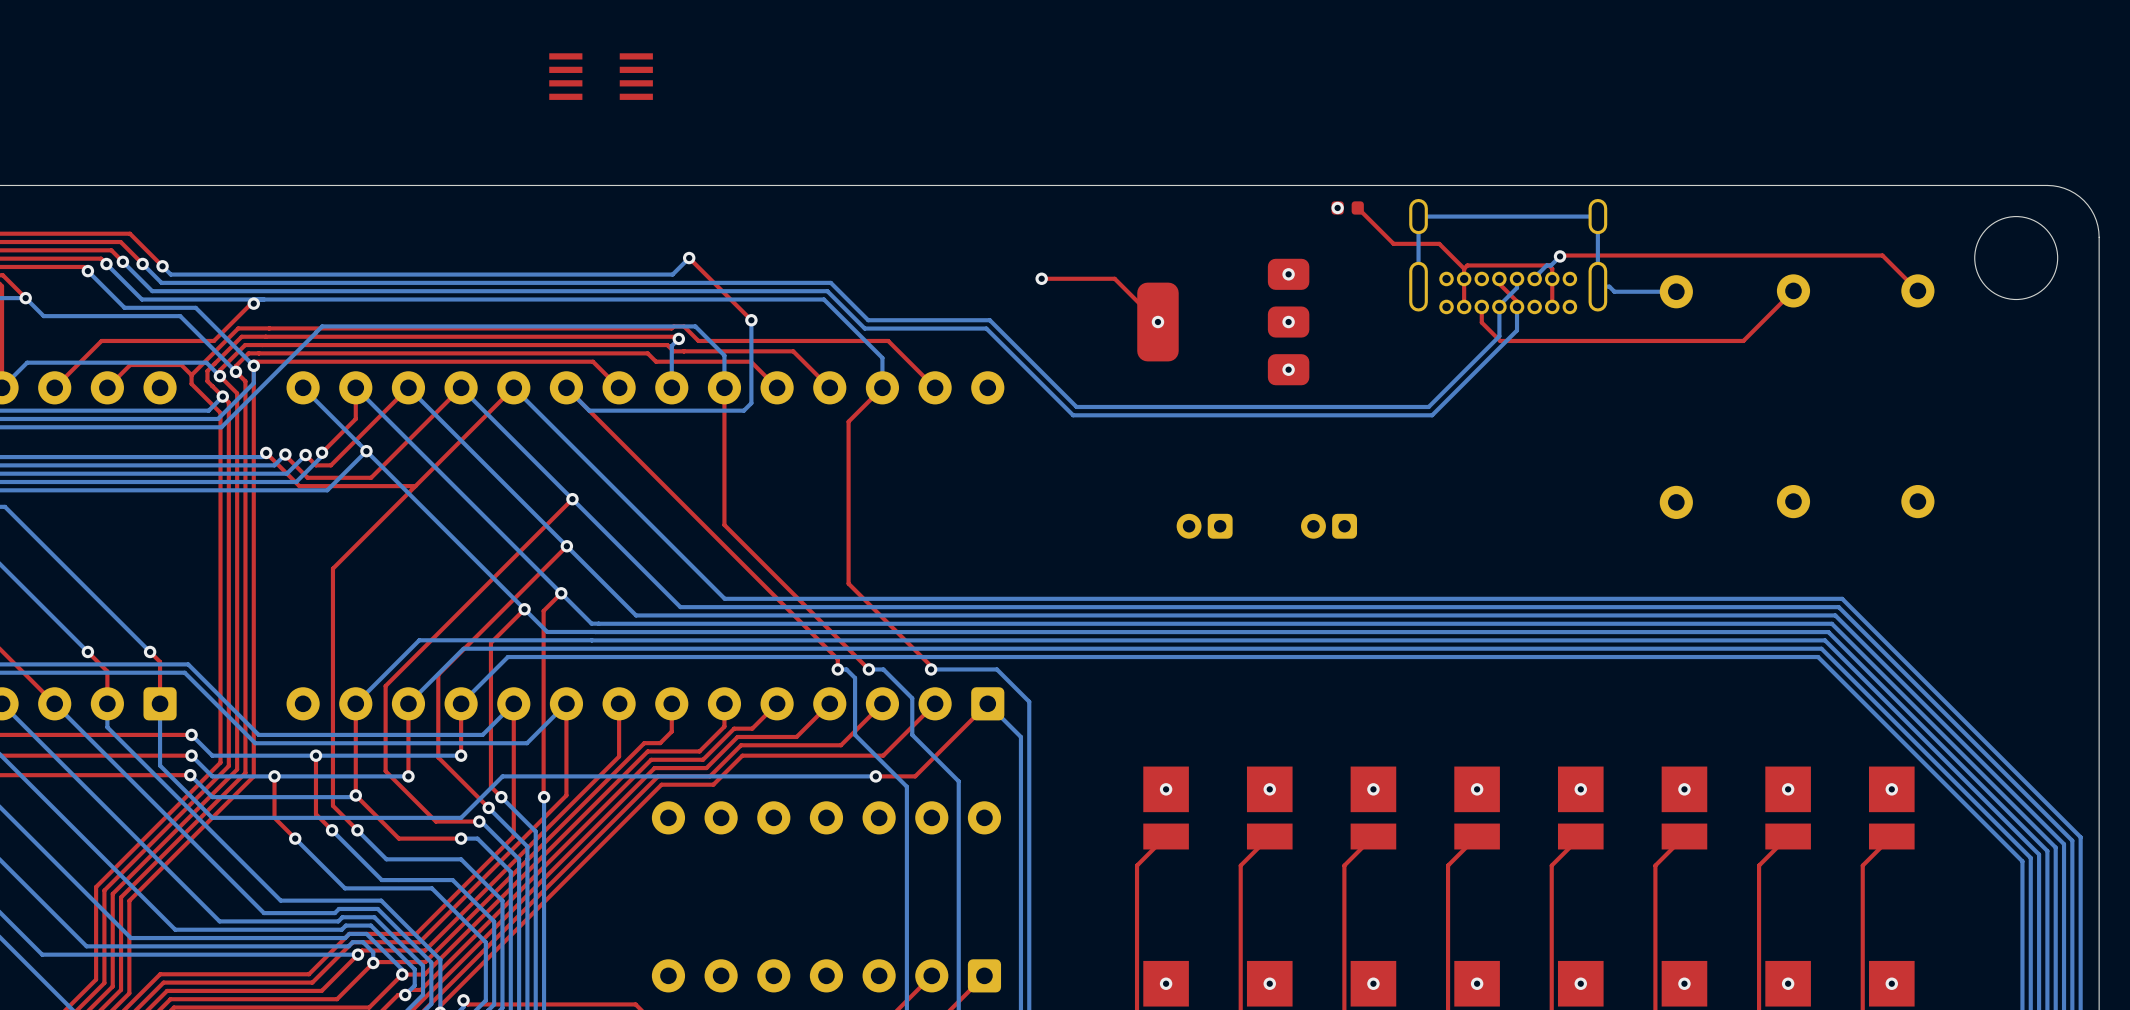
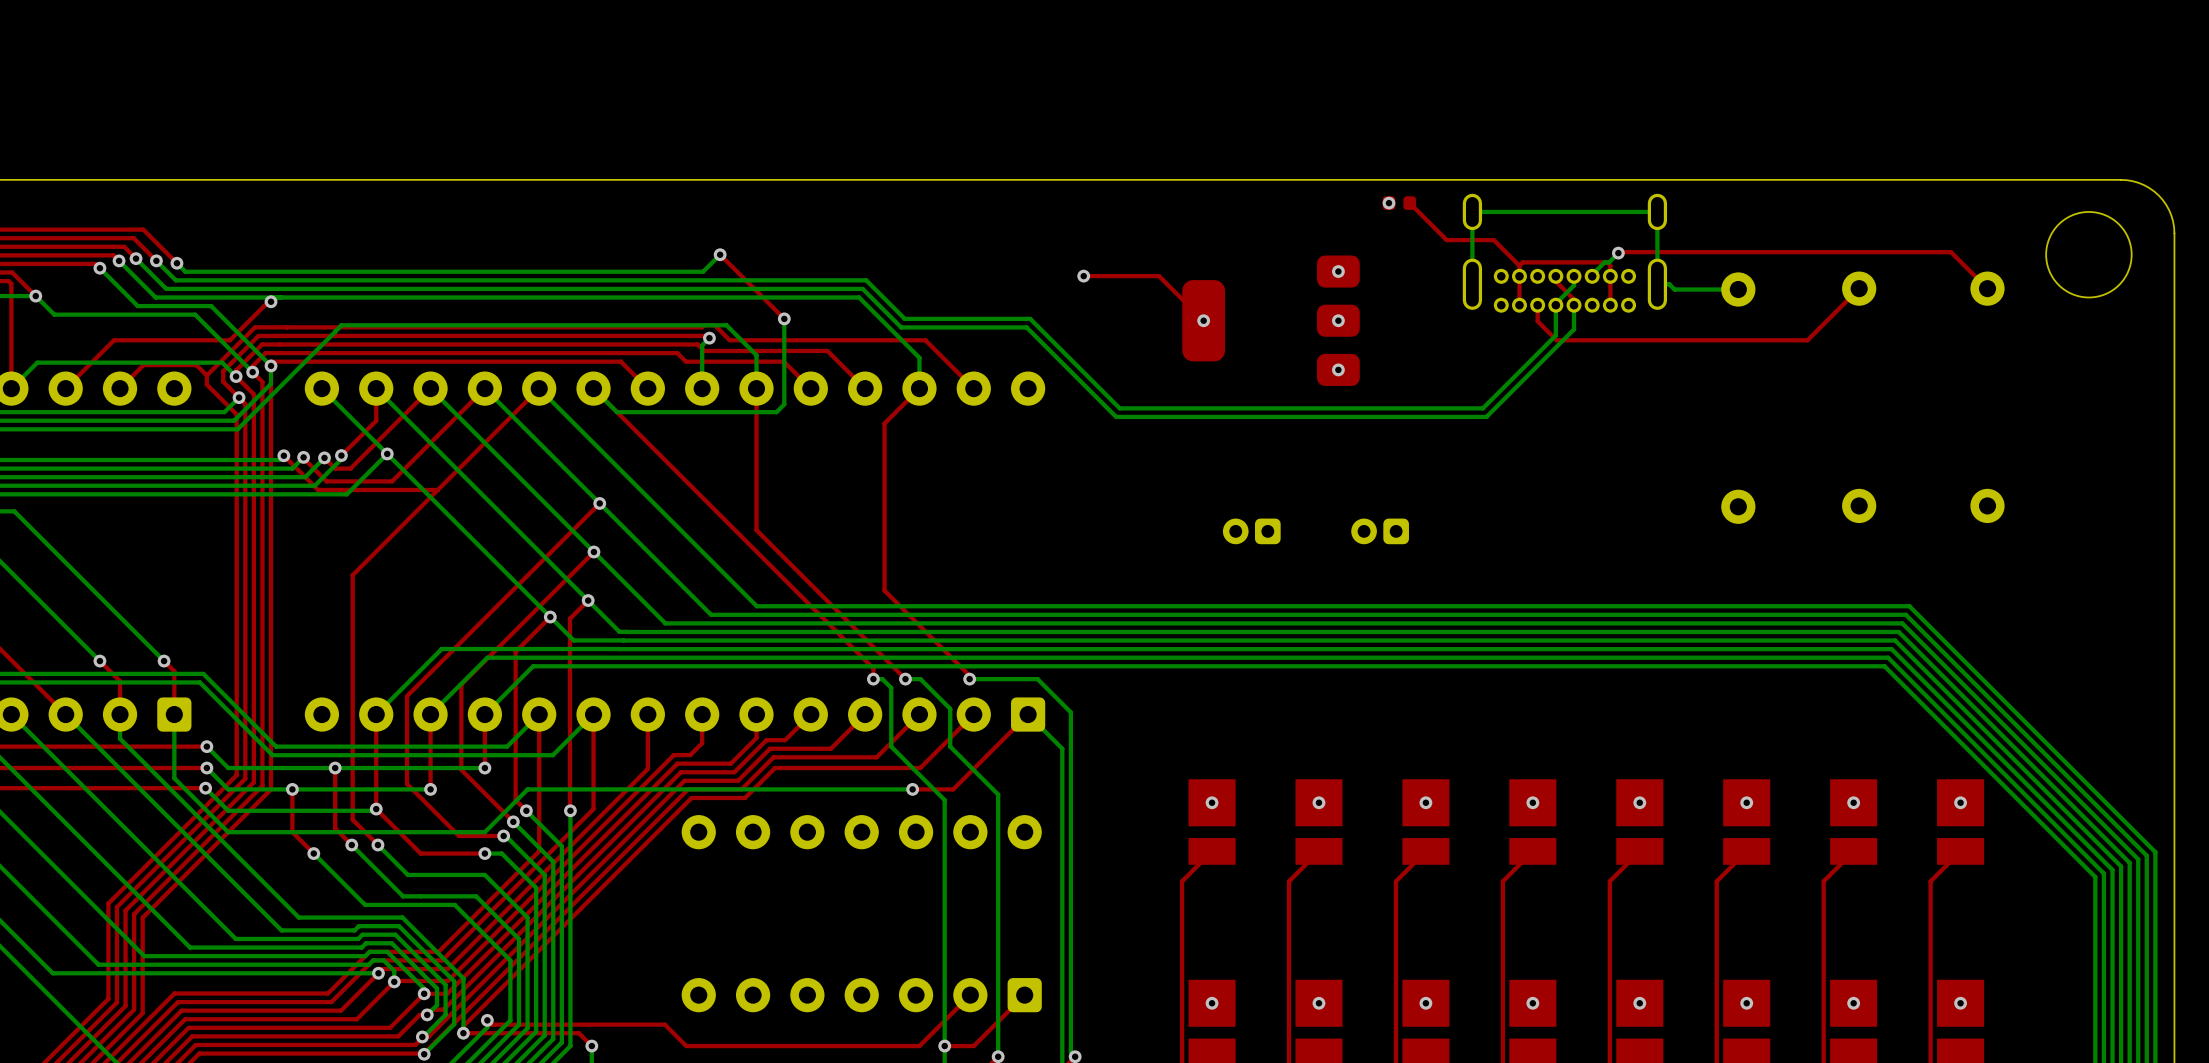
part: (601, 76) -> none

